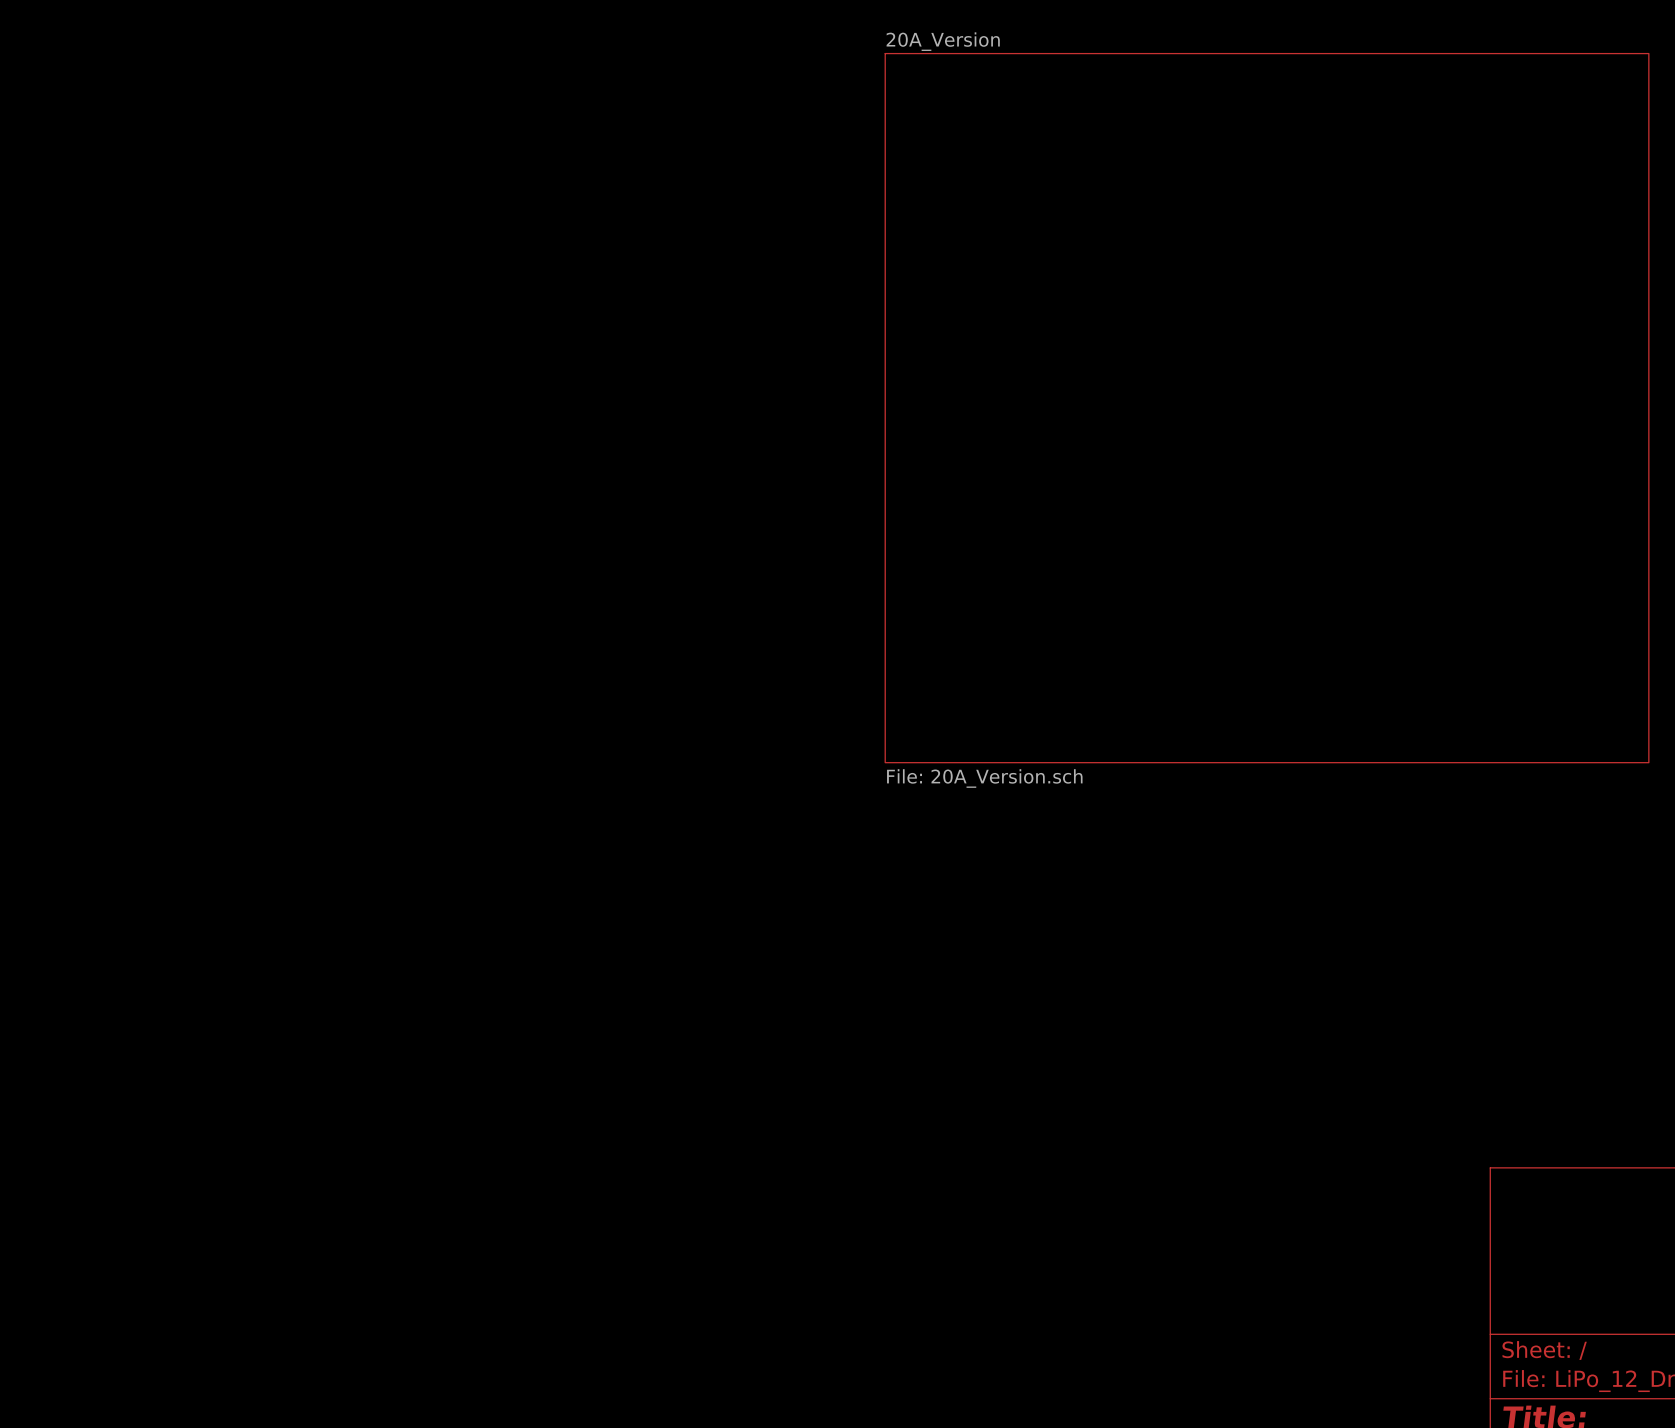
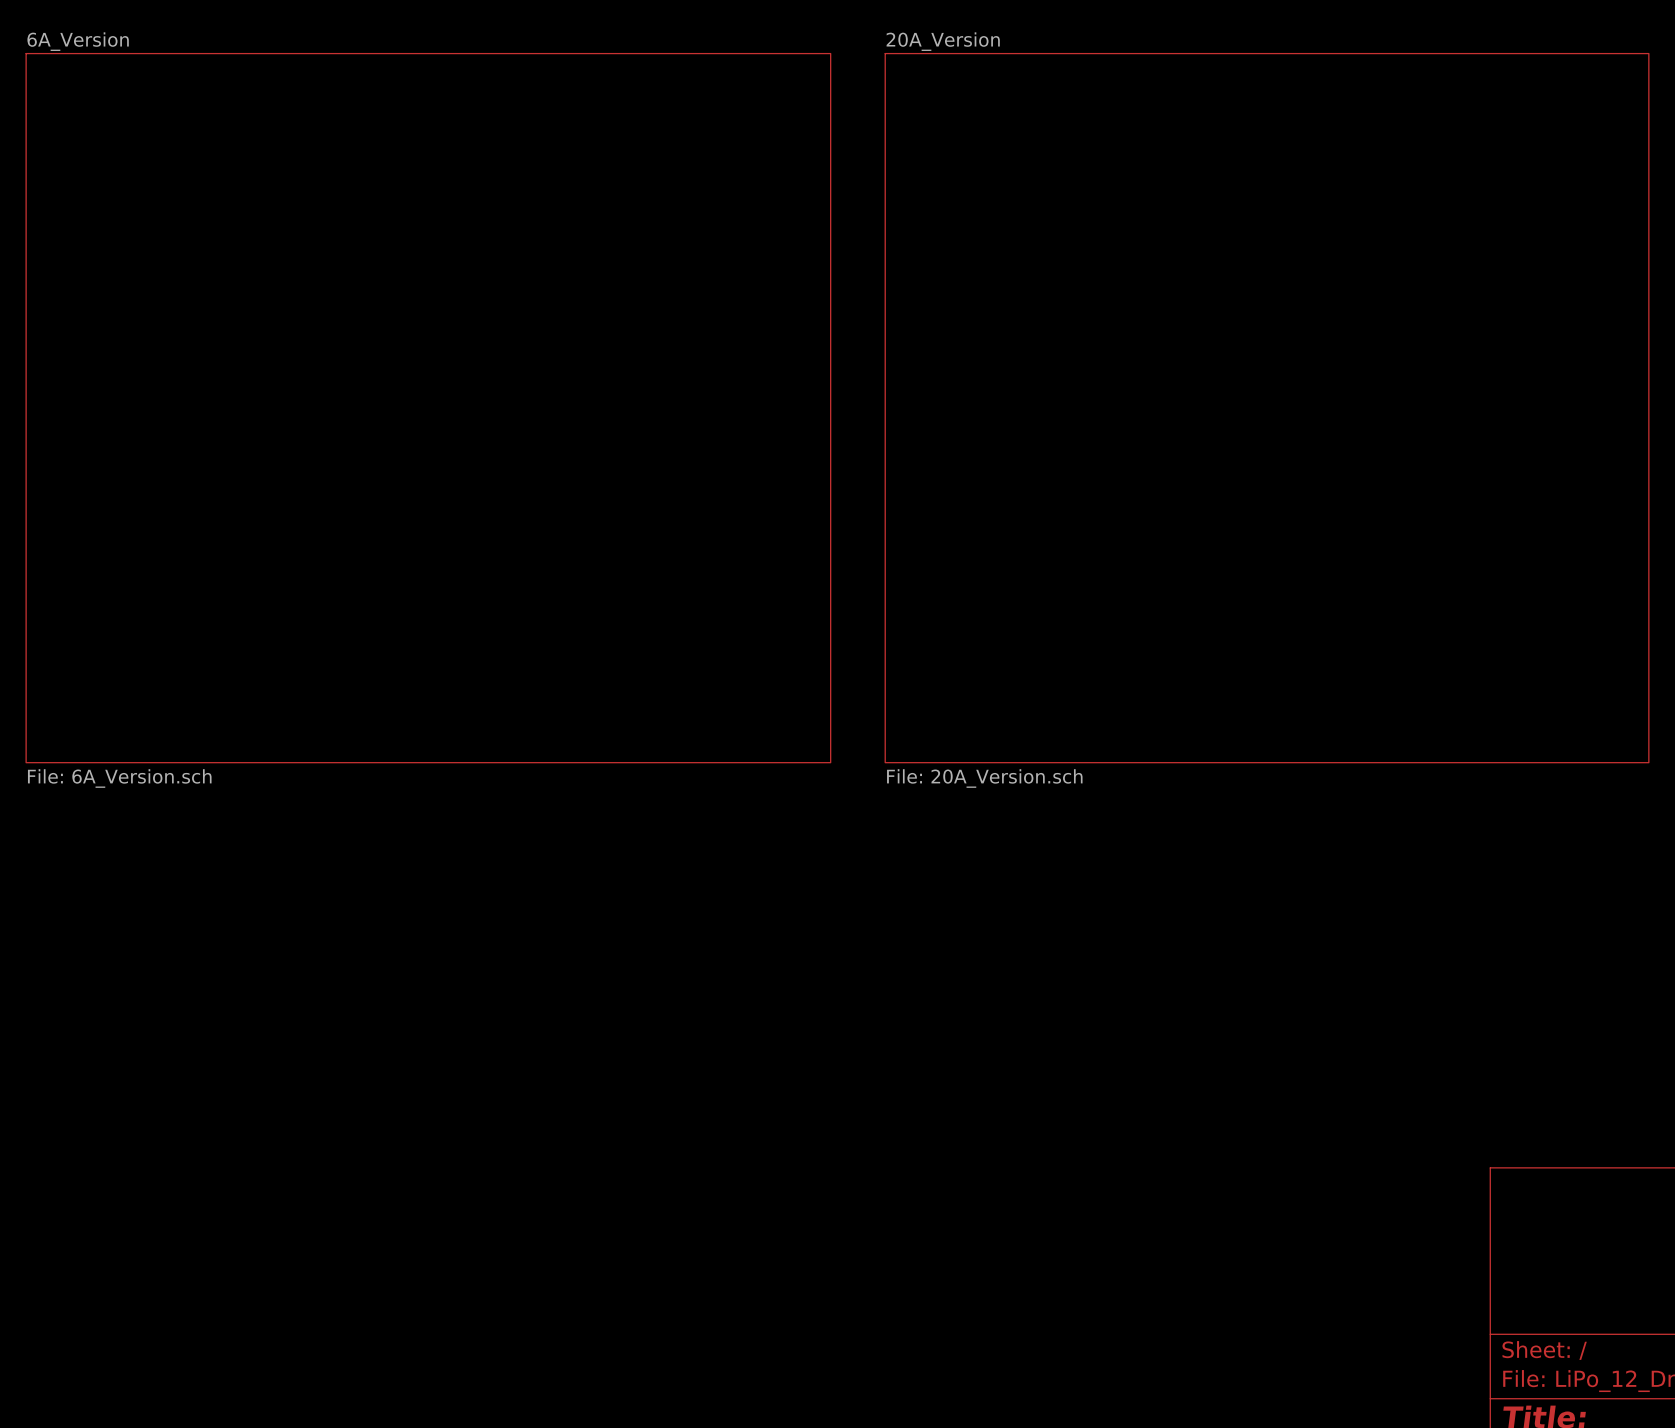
sheet 6A_Version: none -> File: 6A_Version.sch (428, 408)

